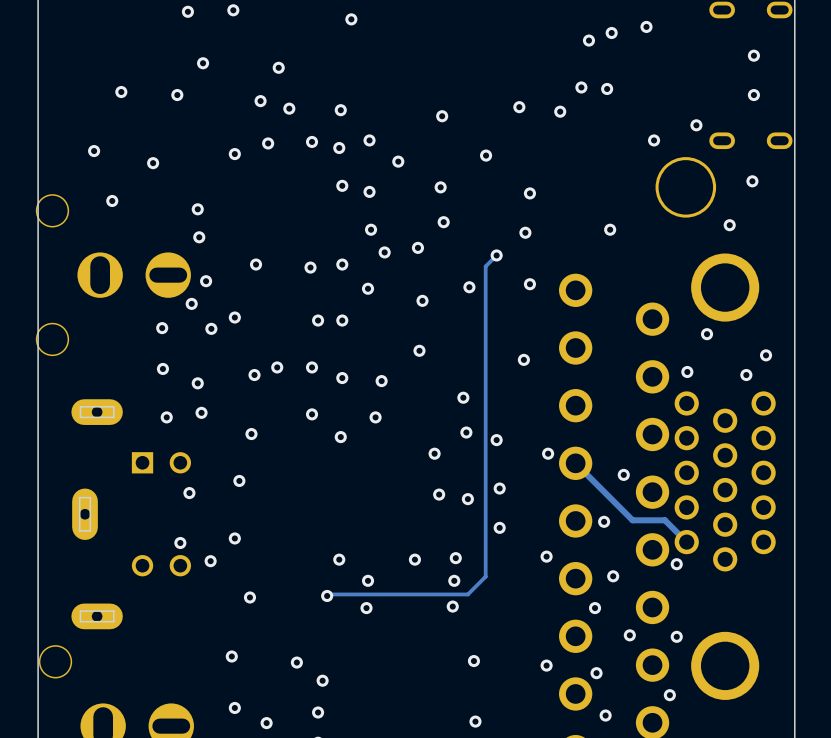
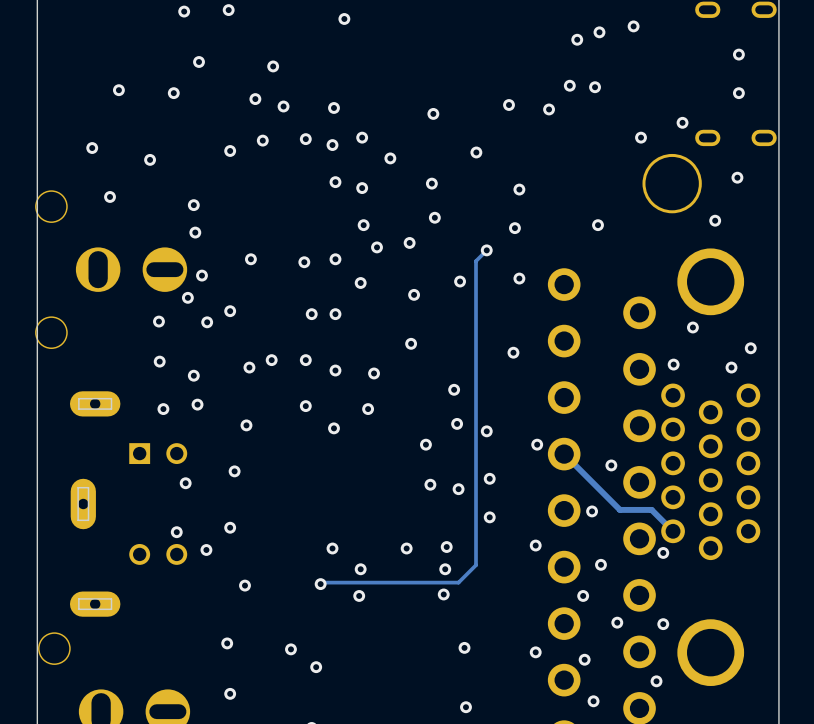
via: (318, 712) -> none
via: (266, 723) -> none

